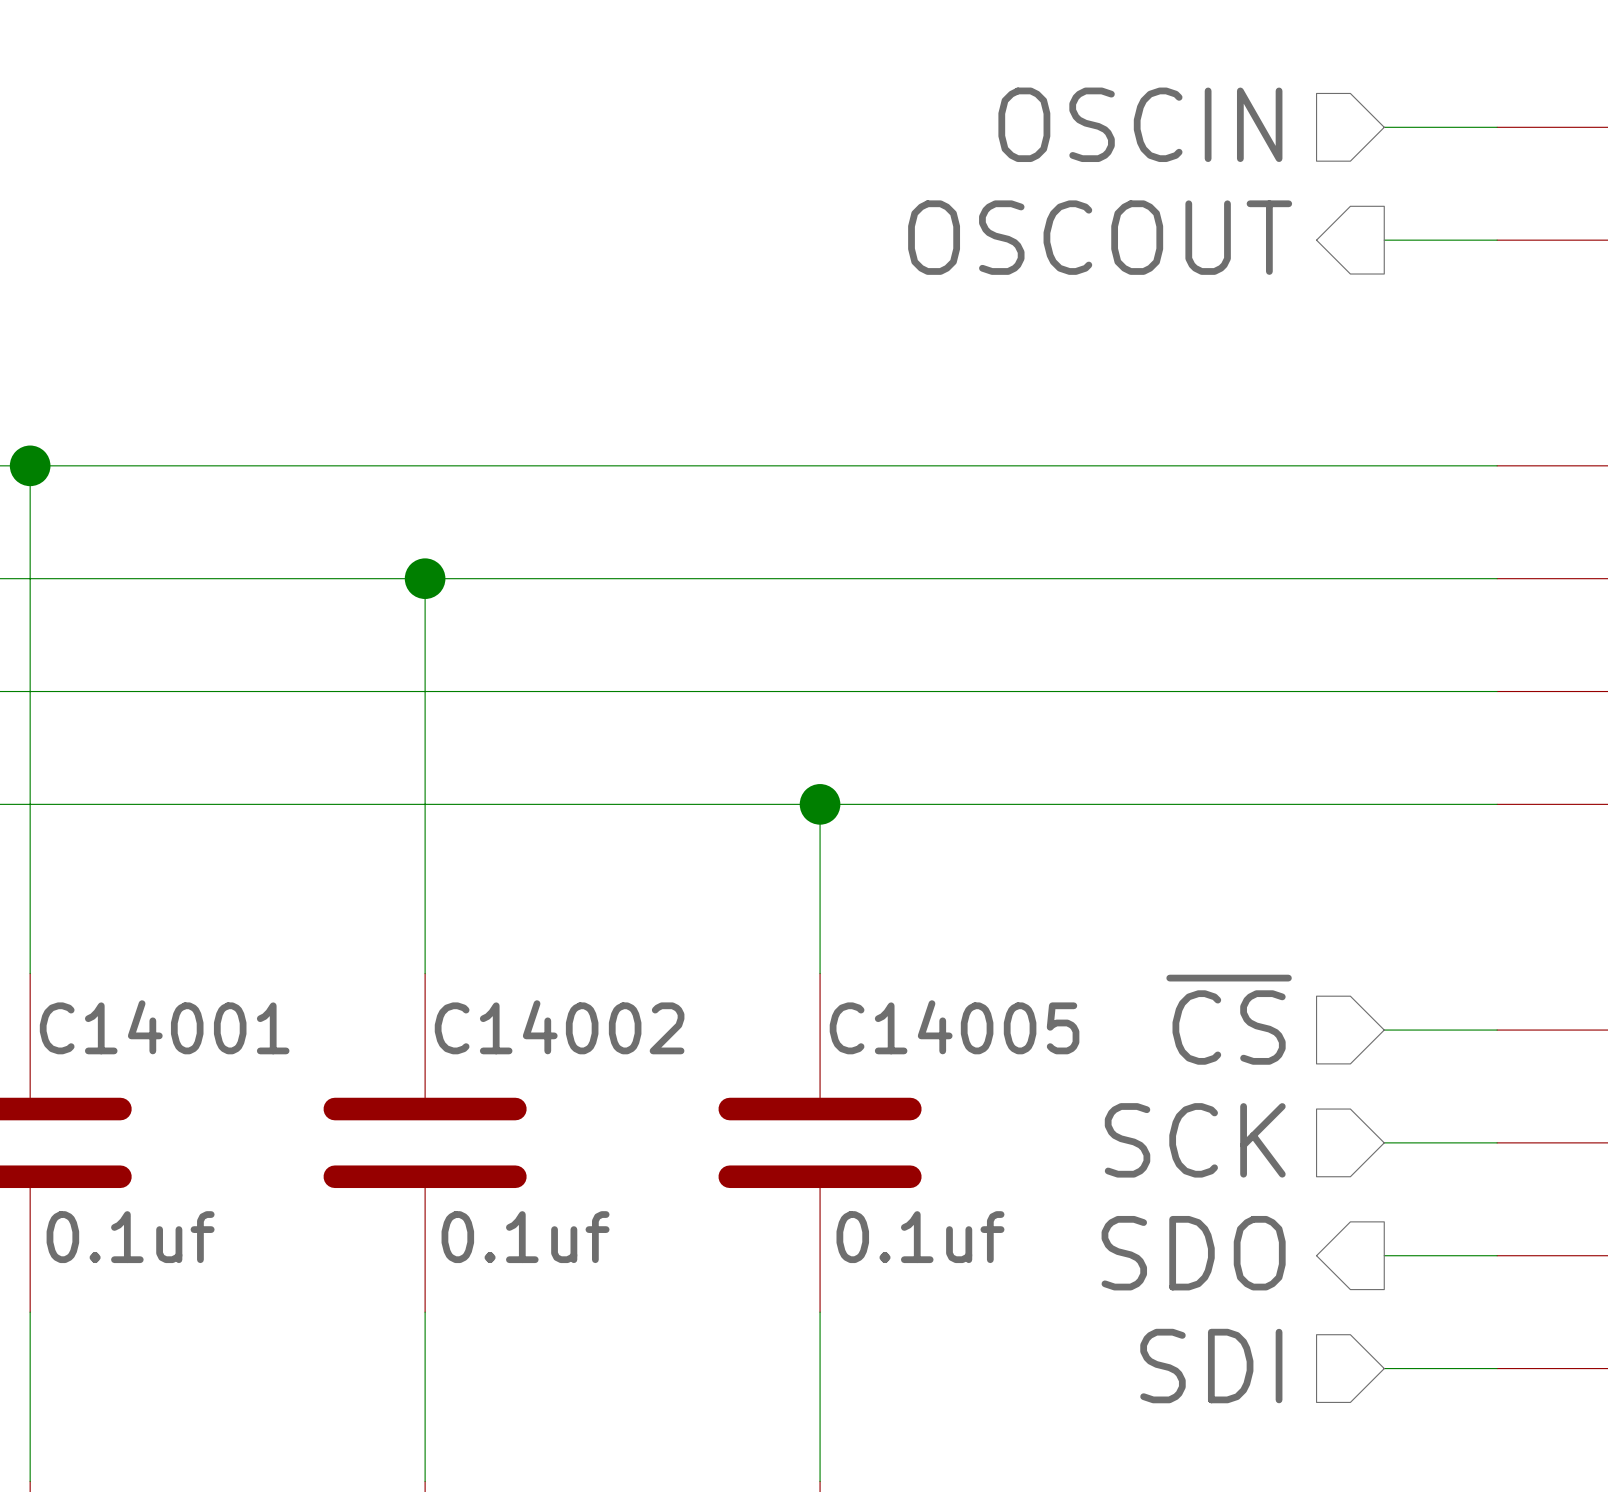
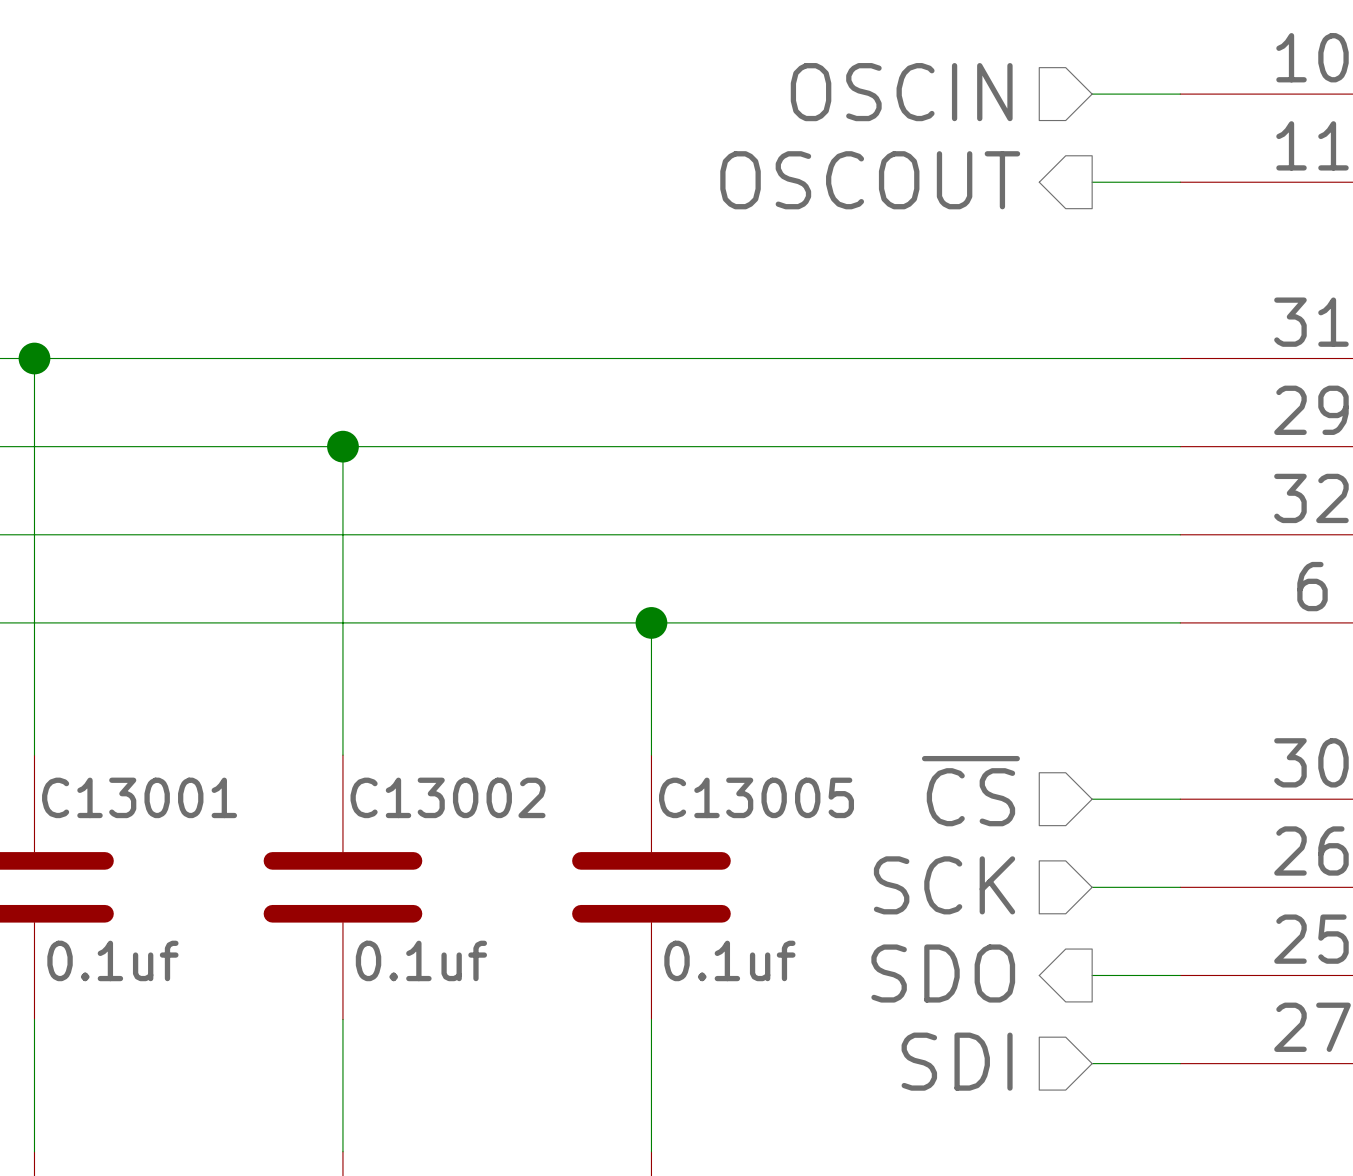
C14001 name: C14001 (164, 1027) -> C13001 (139, 797)
C14002 name: C14002 (559, 1027) -> C13002 (448, 797)
C14005 name: C14005 (954, 1027) -> C13005 (756, 797)

